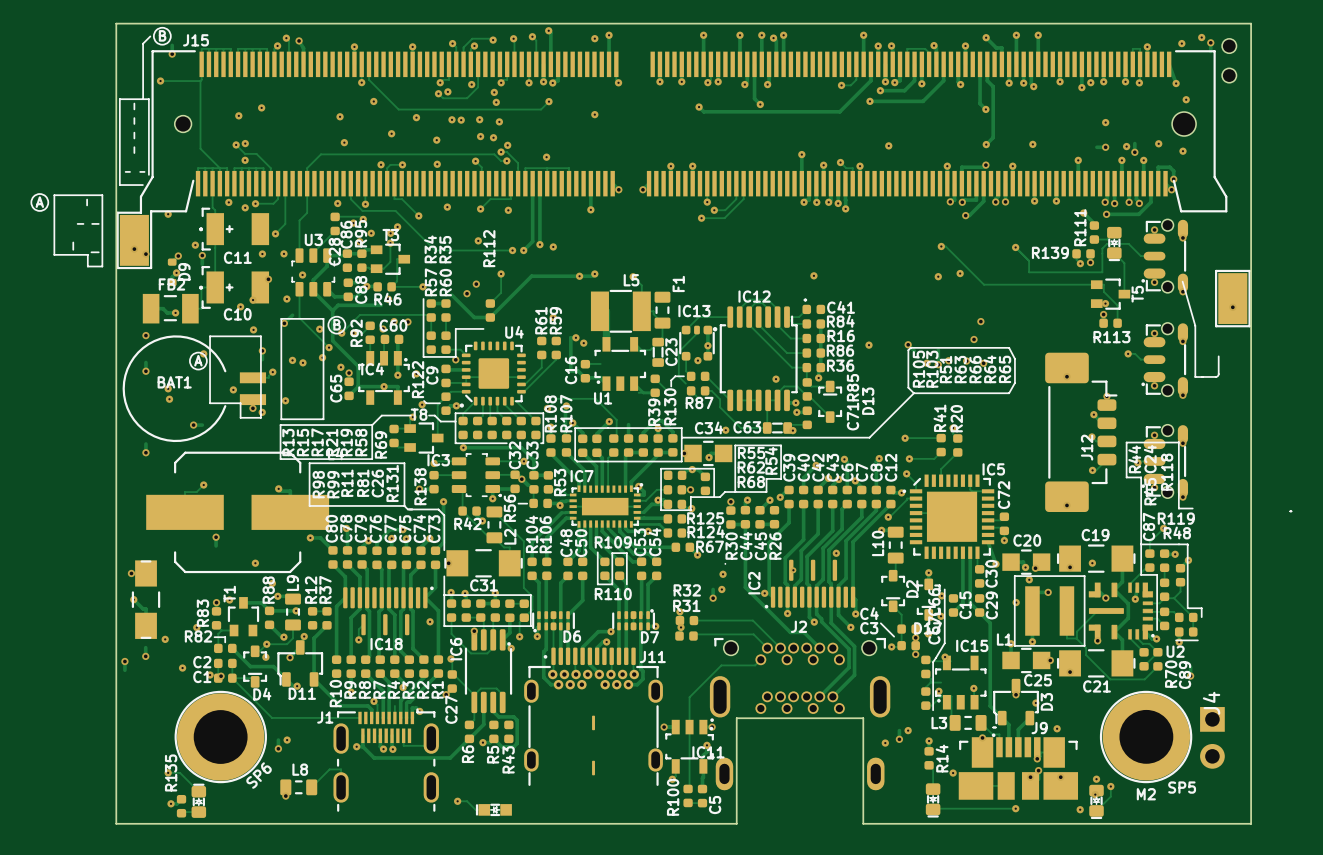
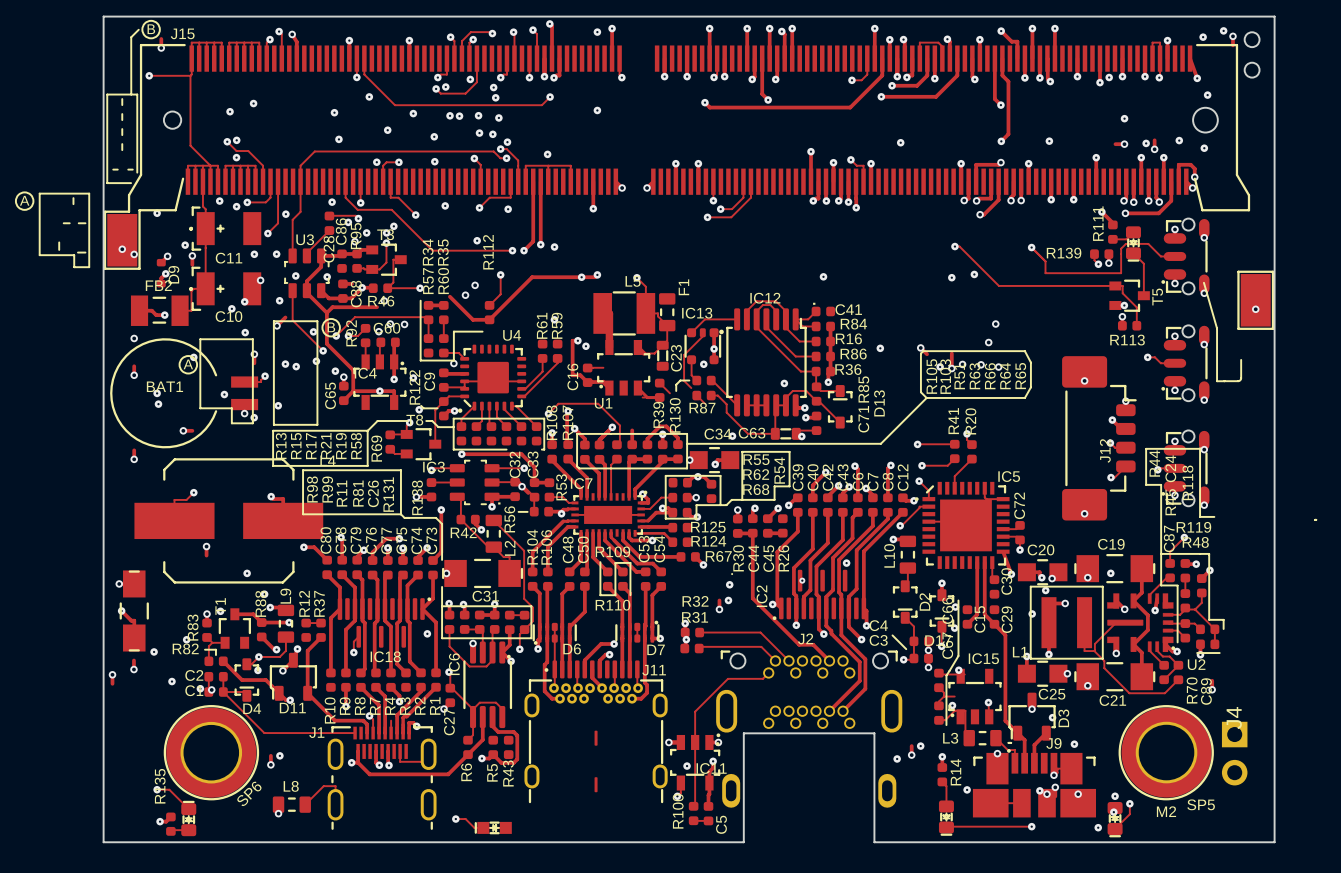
via: none -> (285, 214)
via: none -> (327, 276)
via: none -> (687, 766)
via: none -> (1039, 790)

